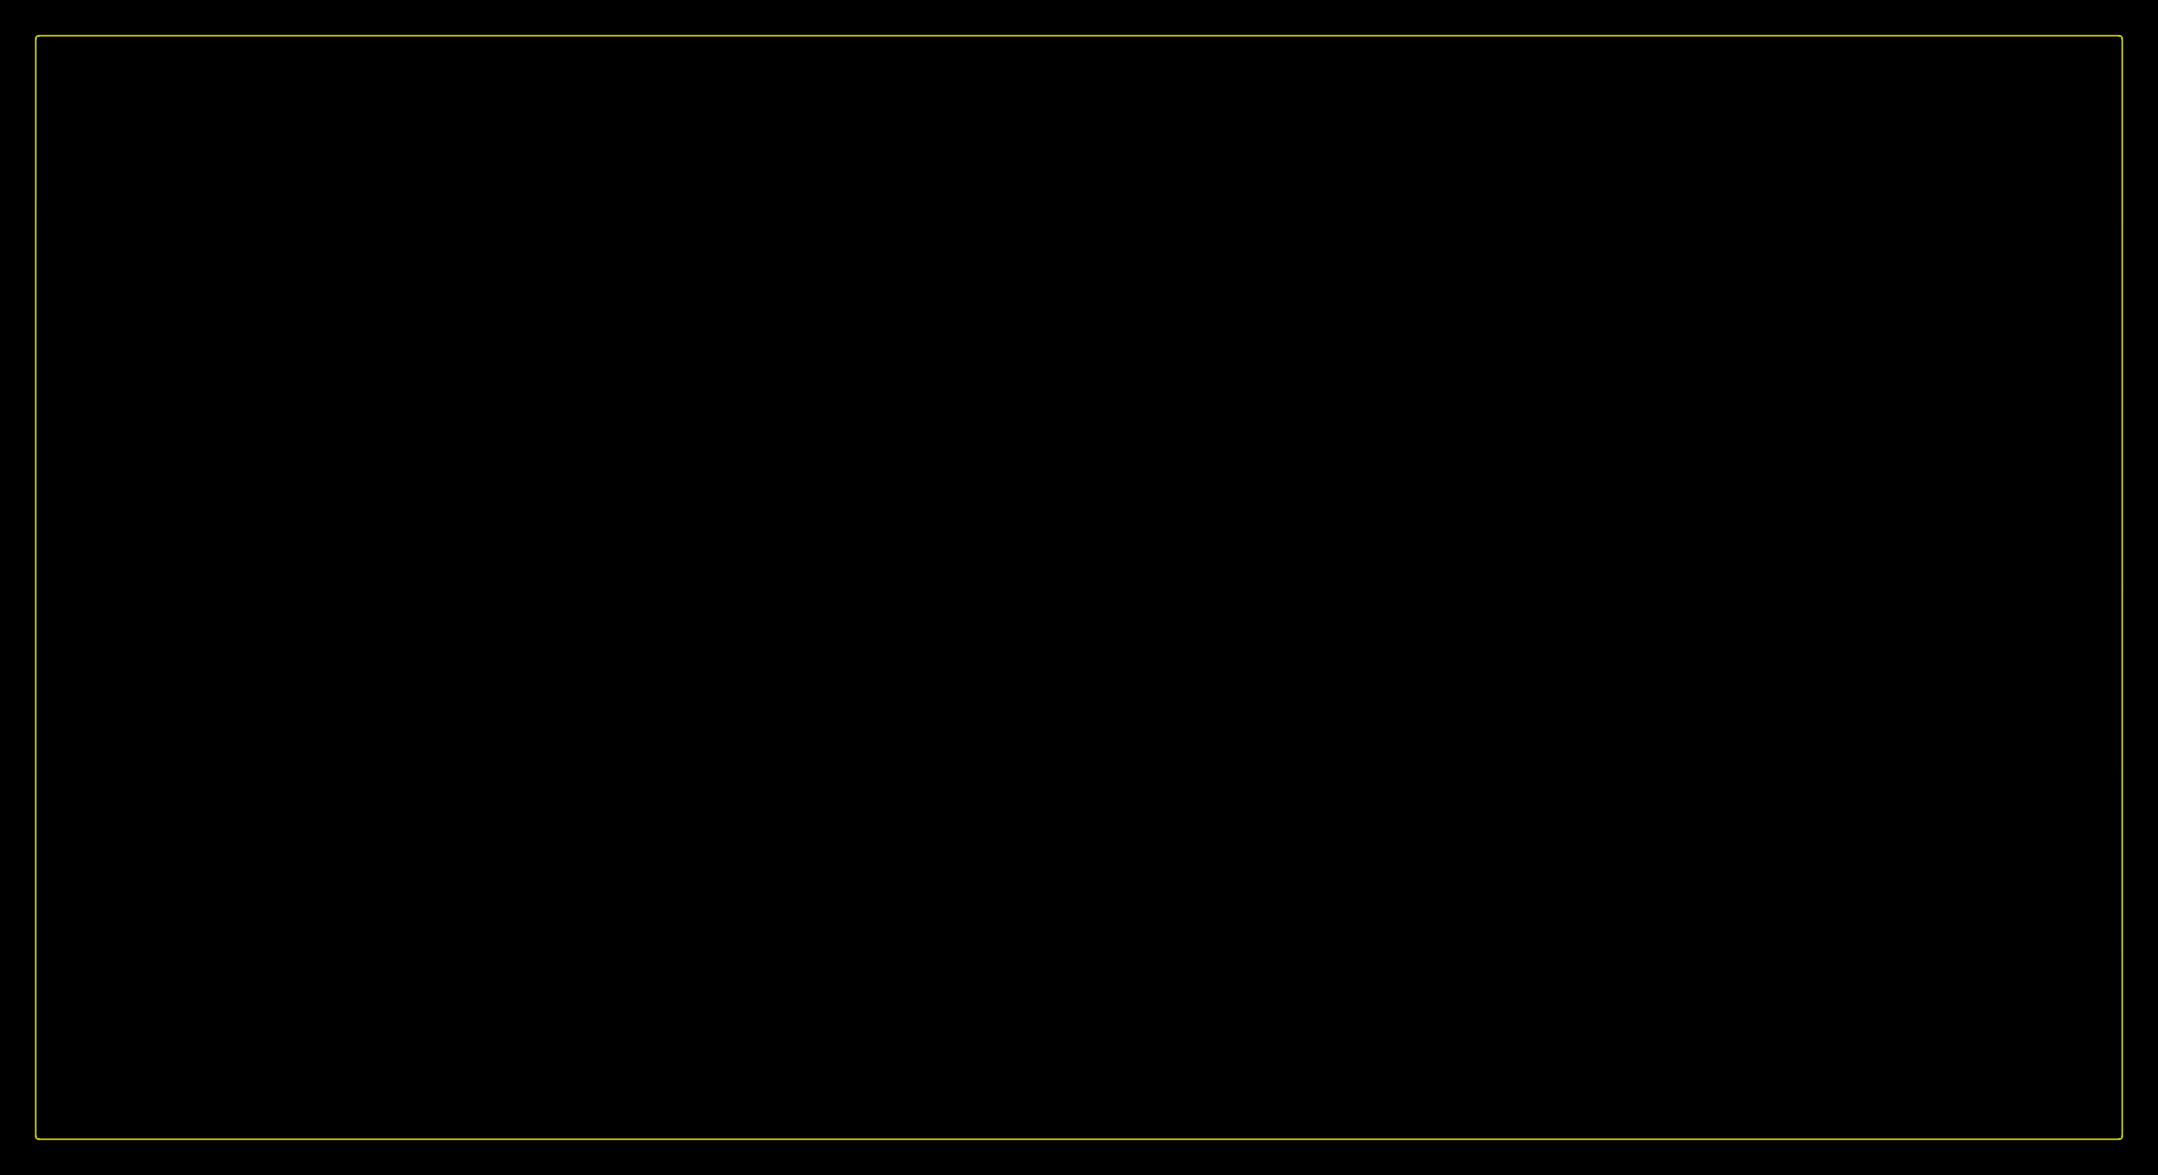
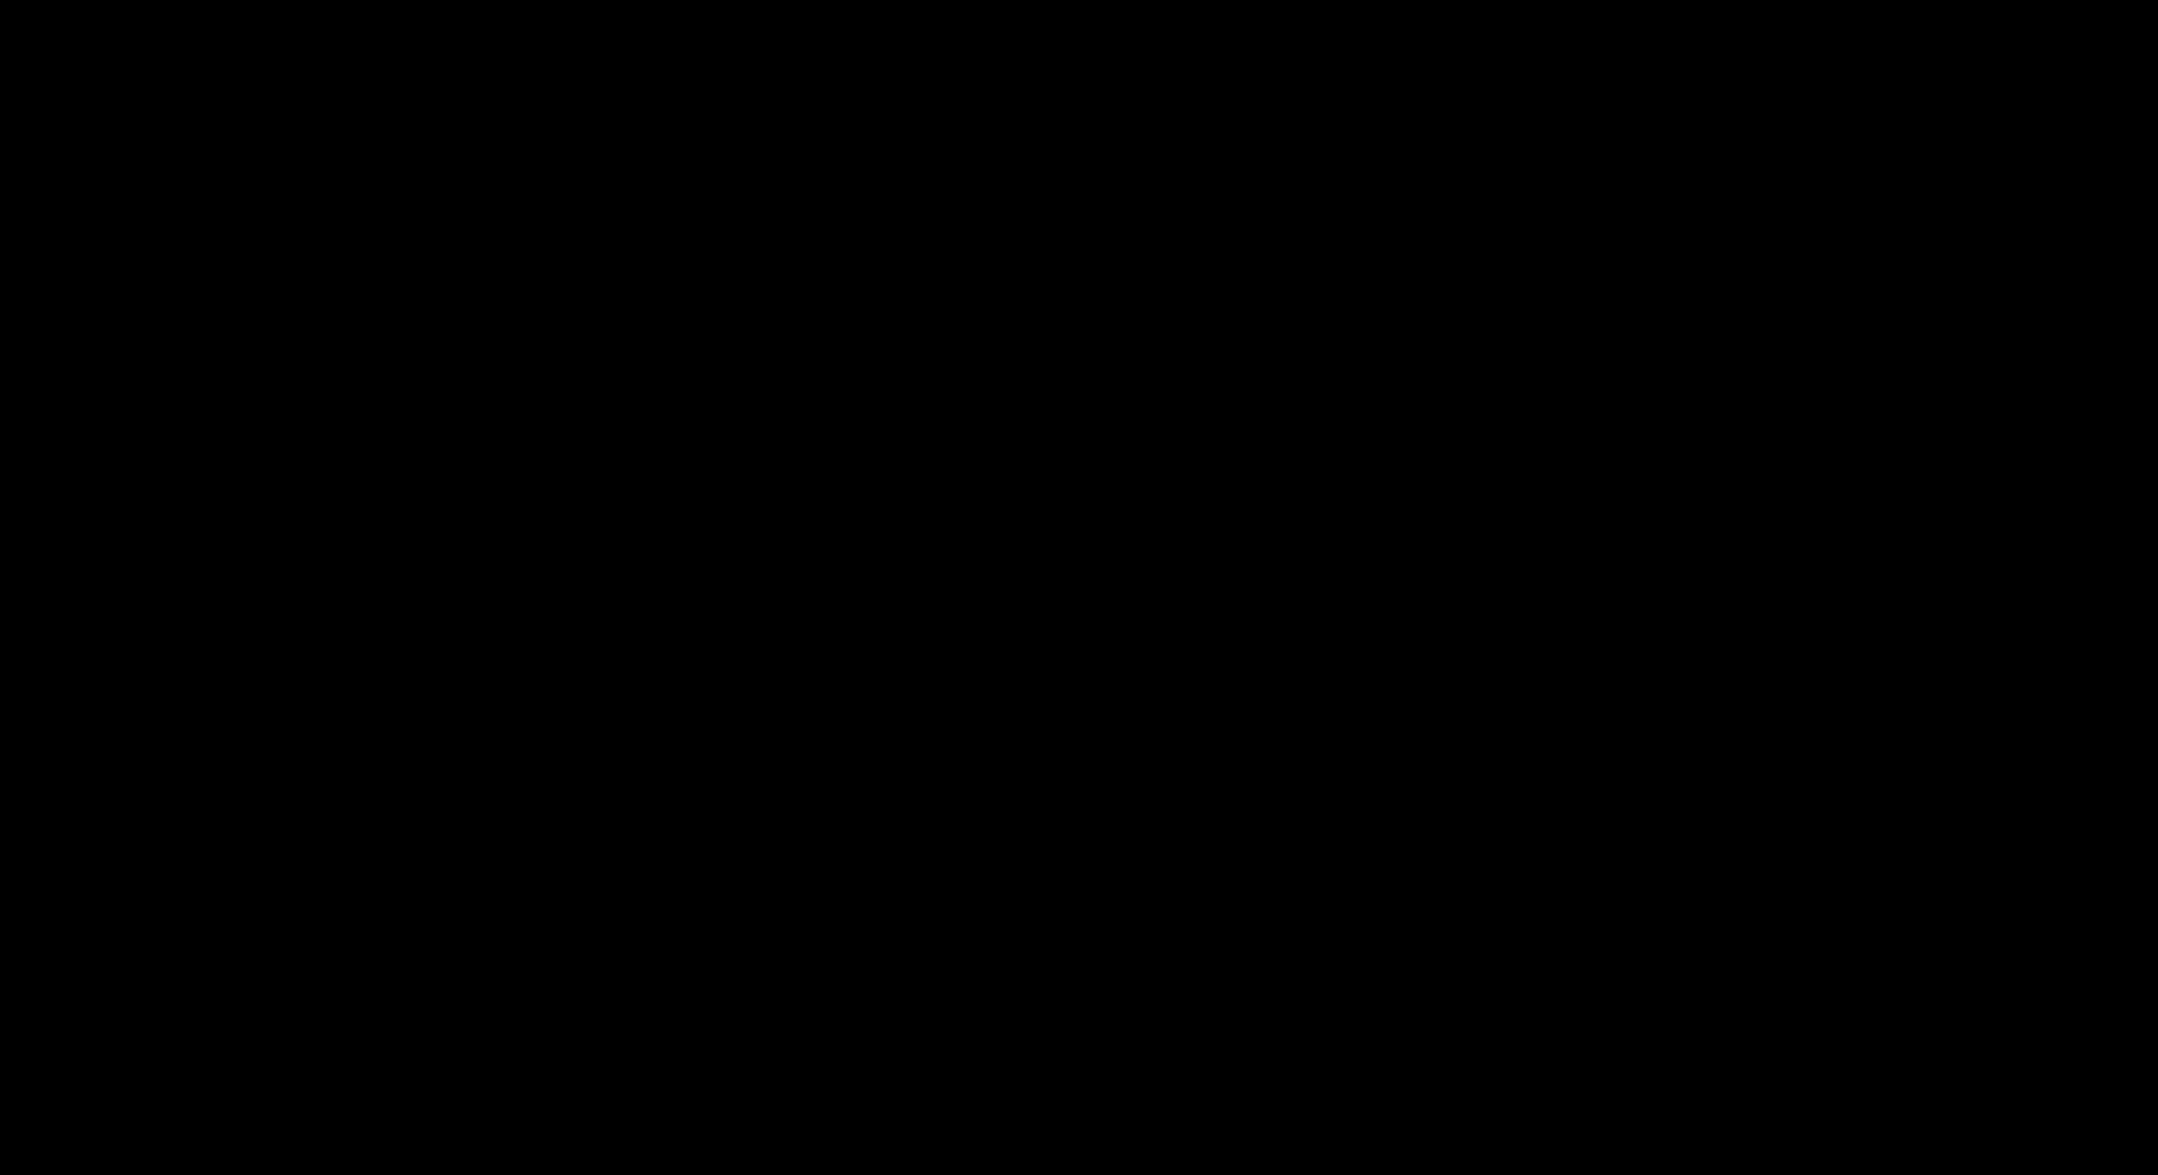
board edge: (2122, 38) (2119, 35) (37, 36) (35, 38) (36, 1137) (38, 1139) (2120, 1138) (2122, 1136) (2122, 38) -> none

